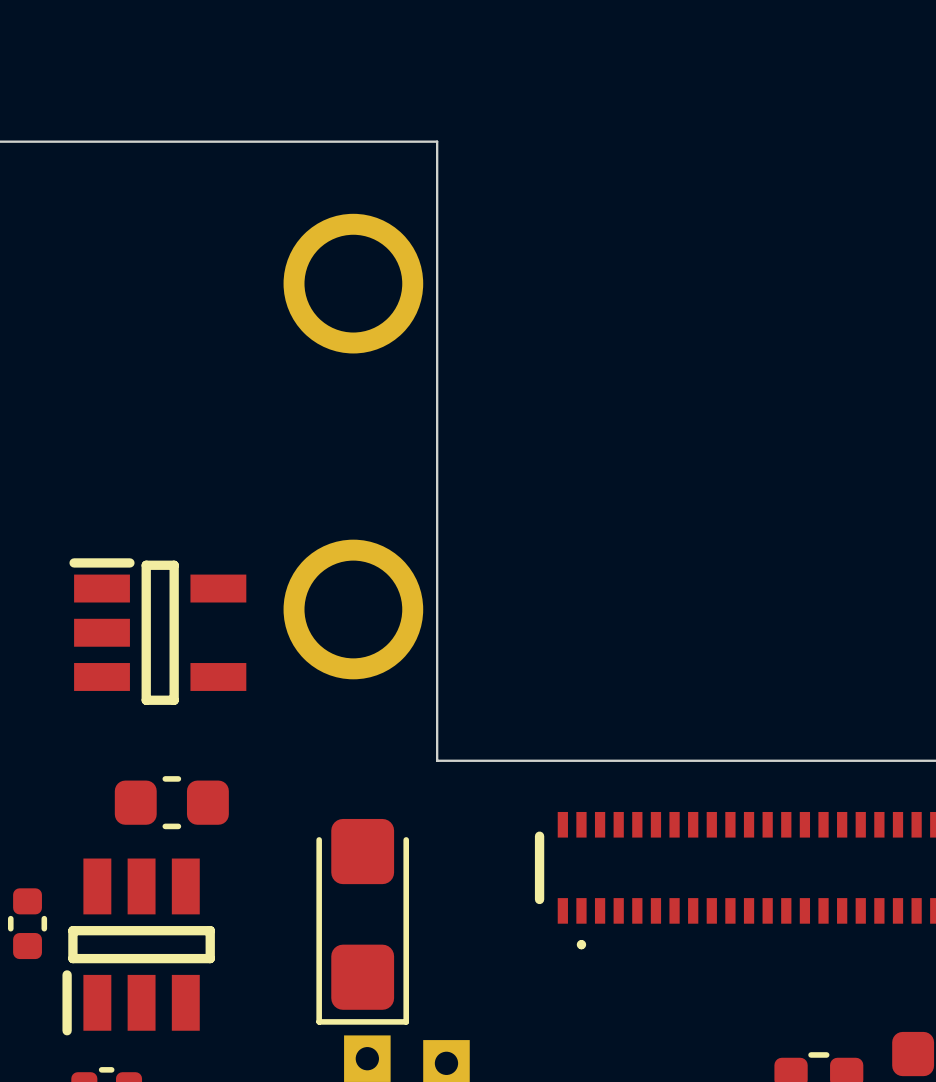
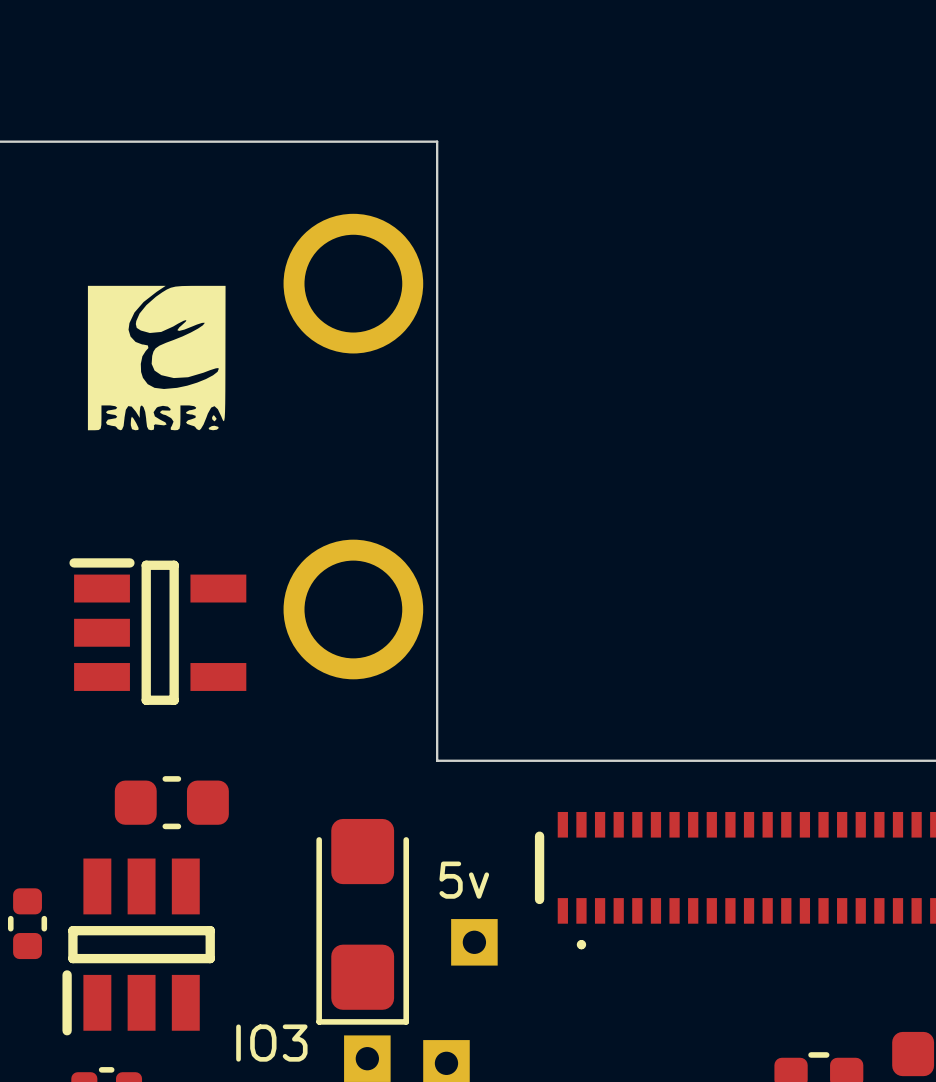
drawing: none -> [87, 285, 226, 431]
text: none -> 5v (464, 880)
part: none -> (474, 942)
text: none -> IO3 (271, 1043)

